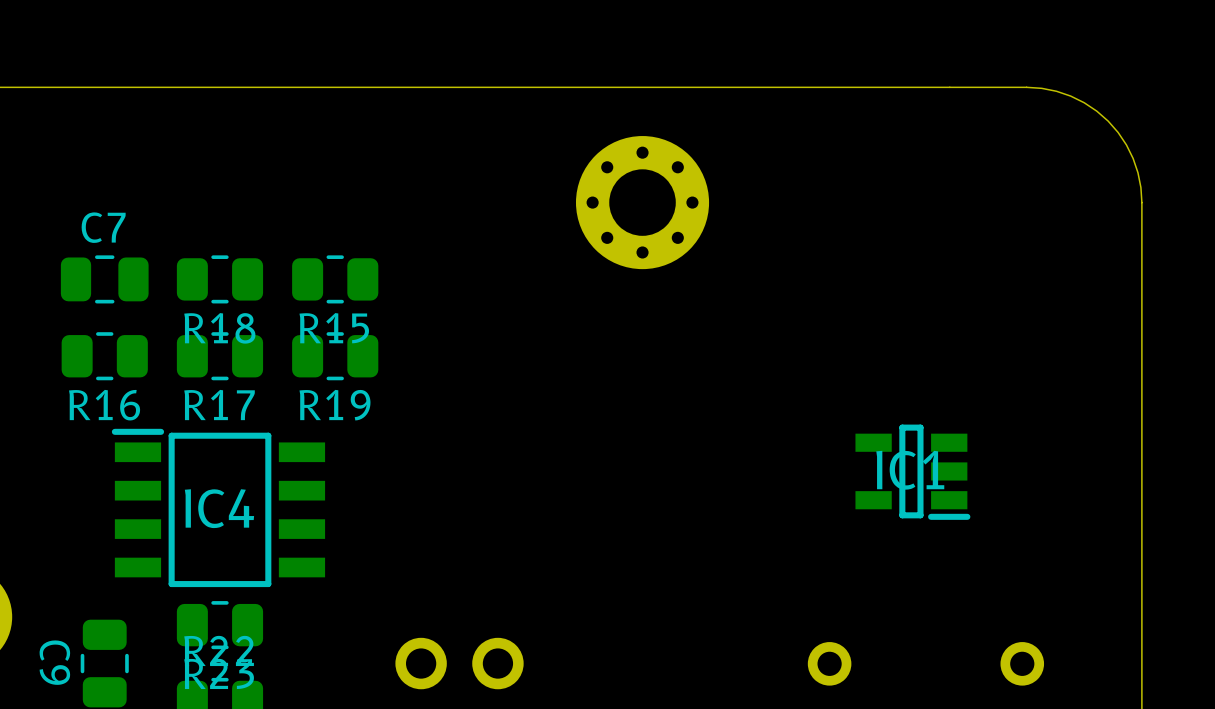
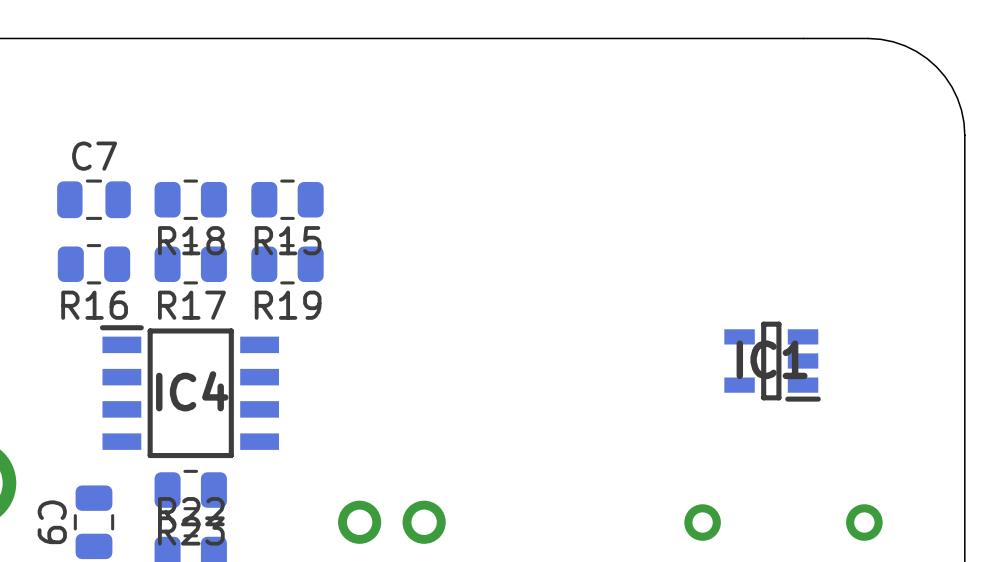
part: (642, 202) -> none

